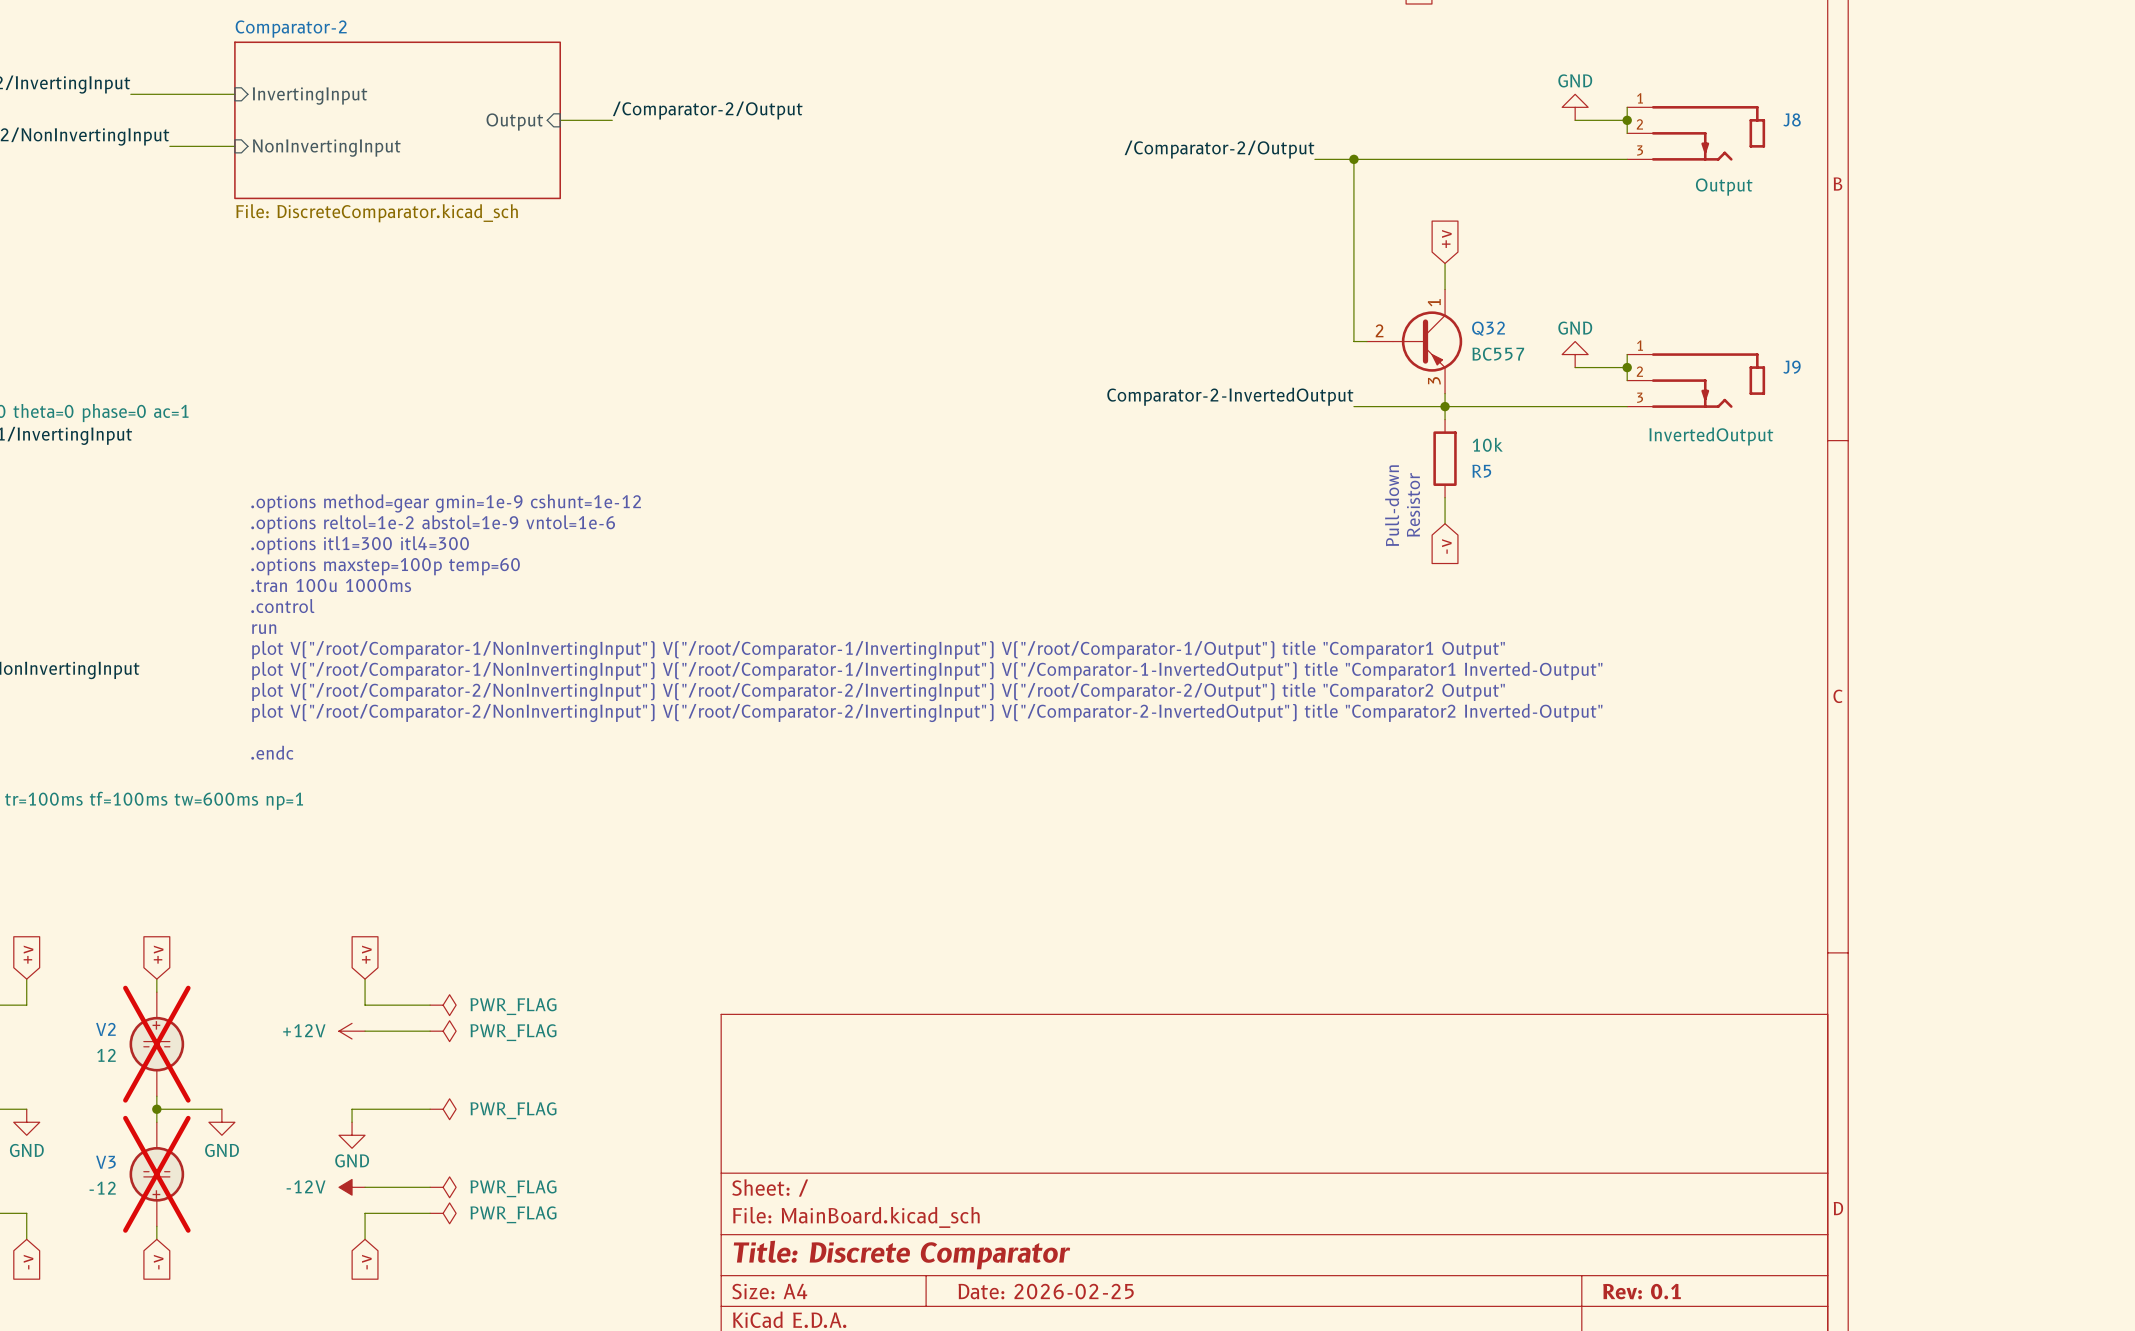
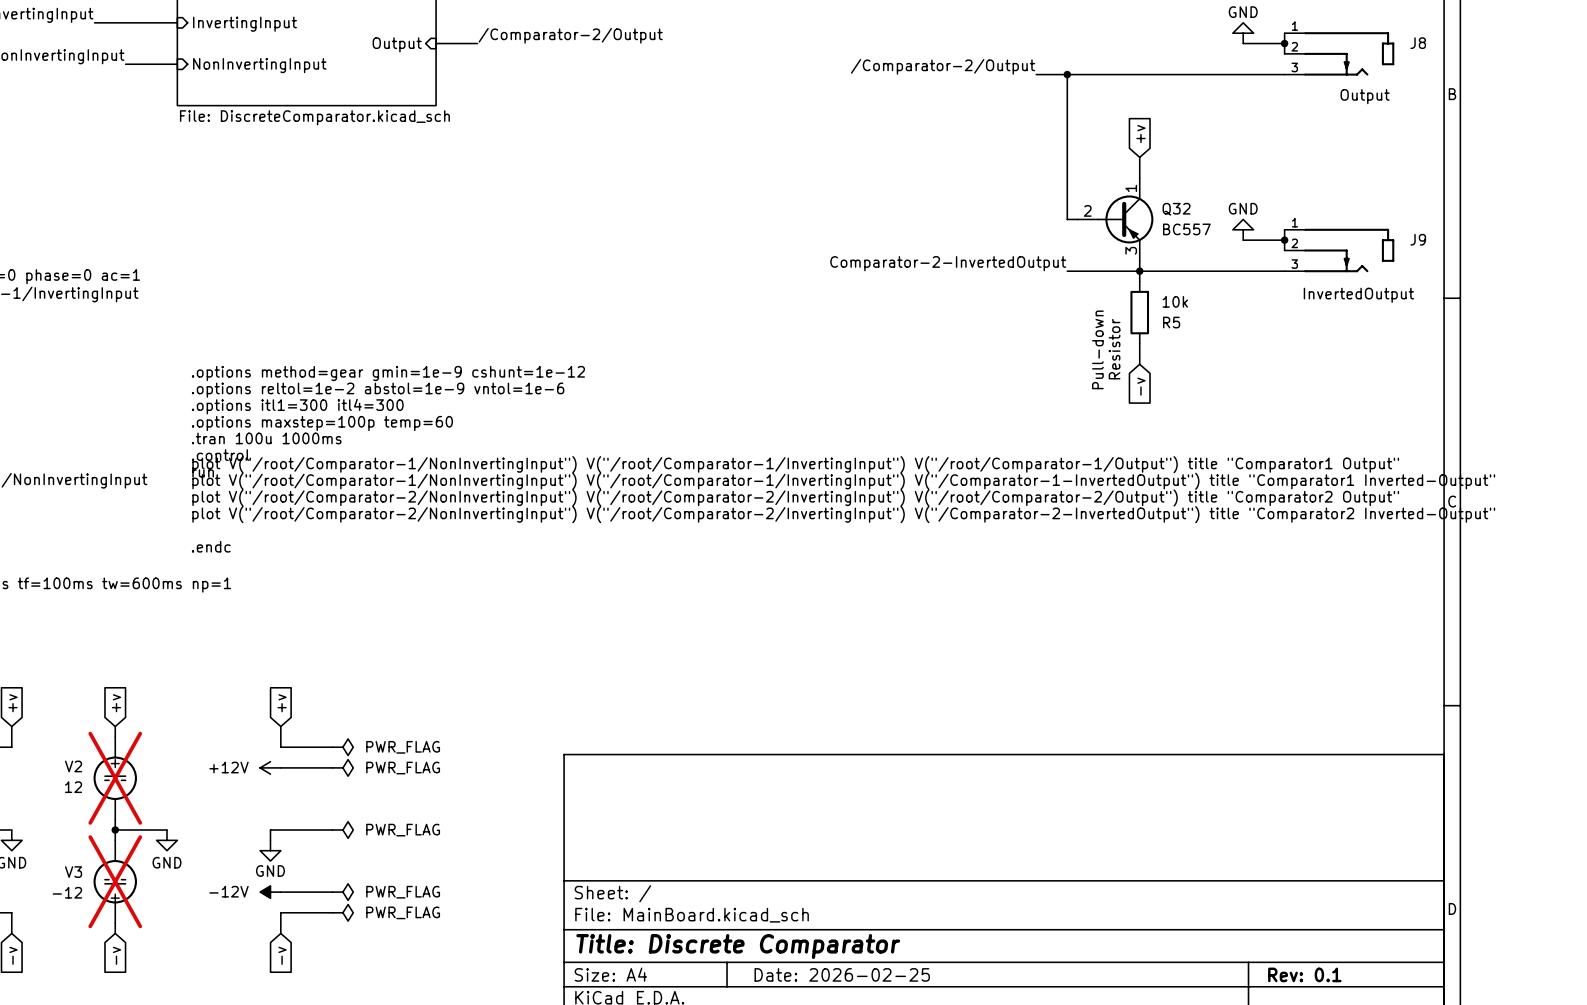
text position: .options method=gear gmin=1e-9 cshunt=1e-12 (446, 503) -> .options method=gear gmin=1e-9 cshunt=1e-12 (388, 373)
text position: .options reltol=1e-2 abstol=1e-9 vntol=1e-6 (433, 524) -> .options reltol=1e-2 abstol=1e-9 vntol=1e-6 (378, 390)
text position: .options itl1=300 itl4=300 (360, 545) -> .options itl1=300 itl4=300 (297, 406)
text position: .options maxstep=100p temp=60 (385, 566) -> .options maxstep=100p temp=60 (322, 423)
text position: .tran 100u 1000ms (331, 585) -> .tran 100u 1000ms (266, 438)
text position: .control (282, 606) -> .control (220, 455)
text position: run (264, 629) -> run (203, 473)

